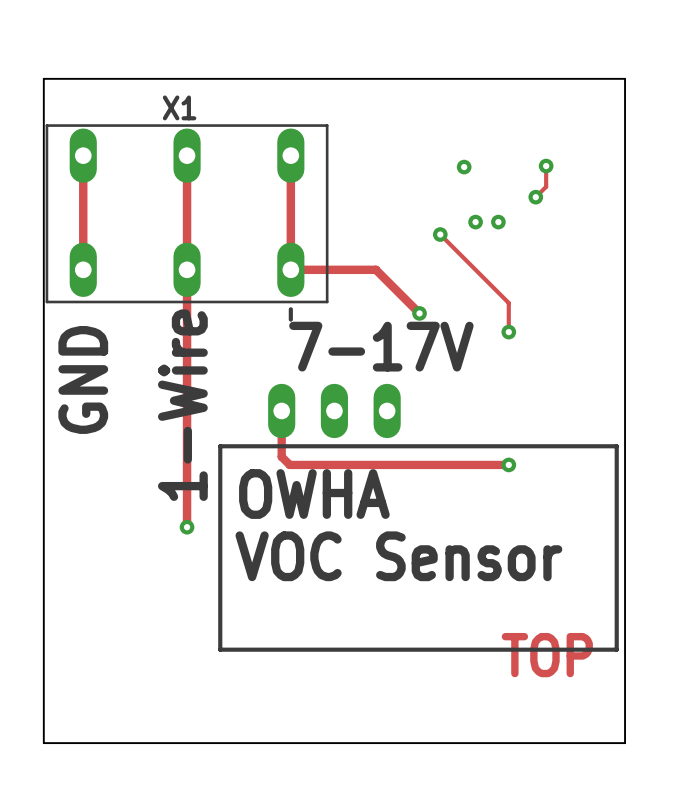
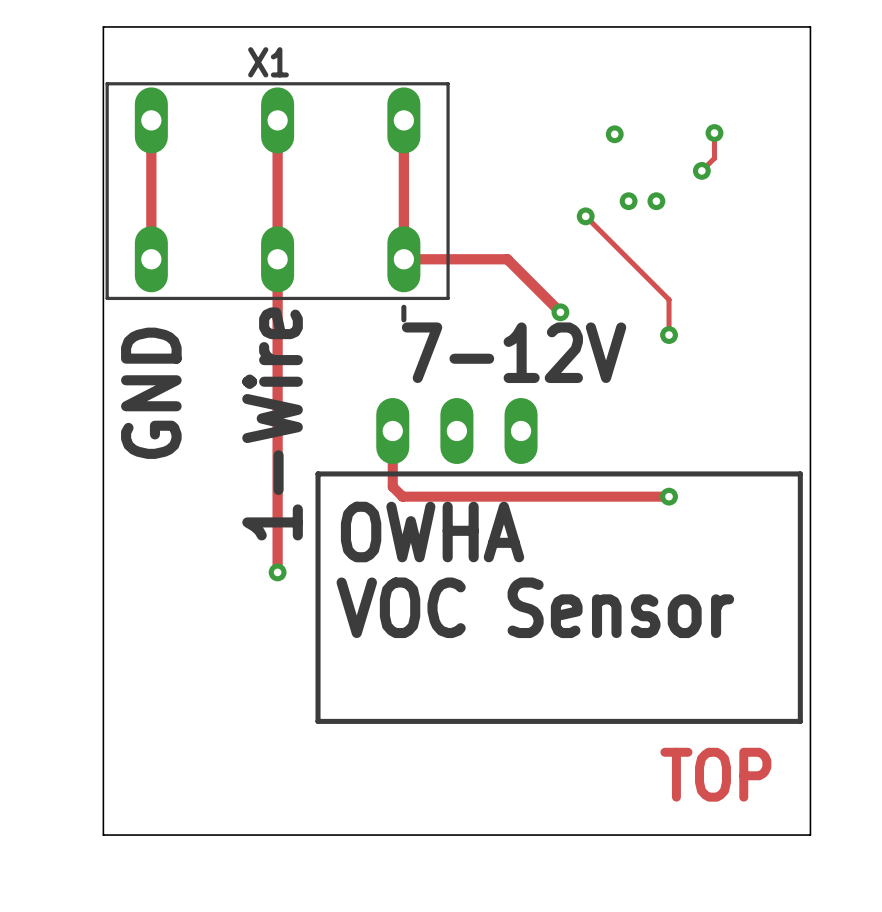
text: 7-17V (381, 346) -> 7-12V (514, 352)
text position: TOP (547, 655) -> TOP (715, 774)

